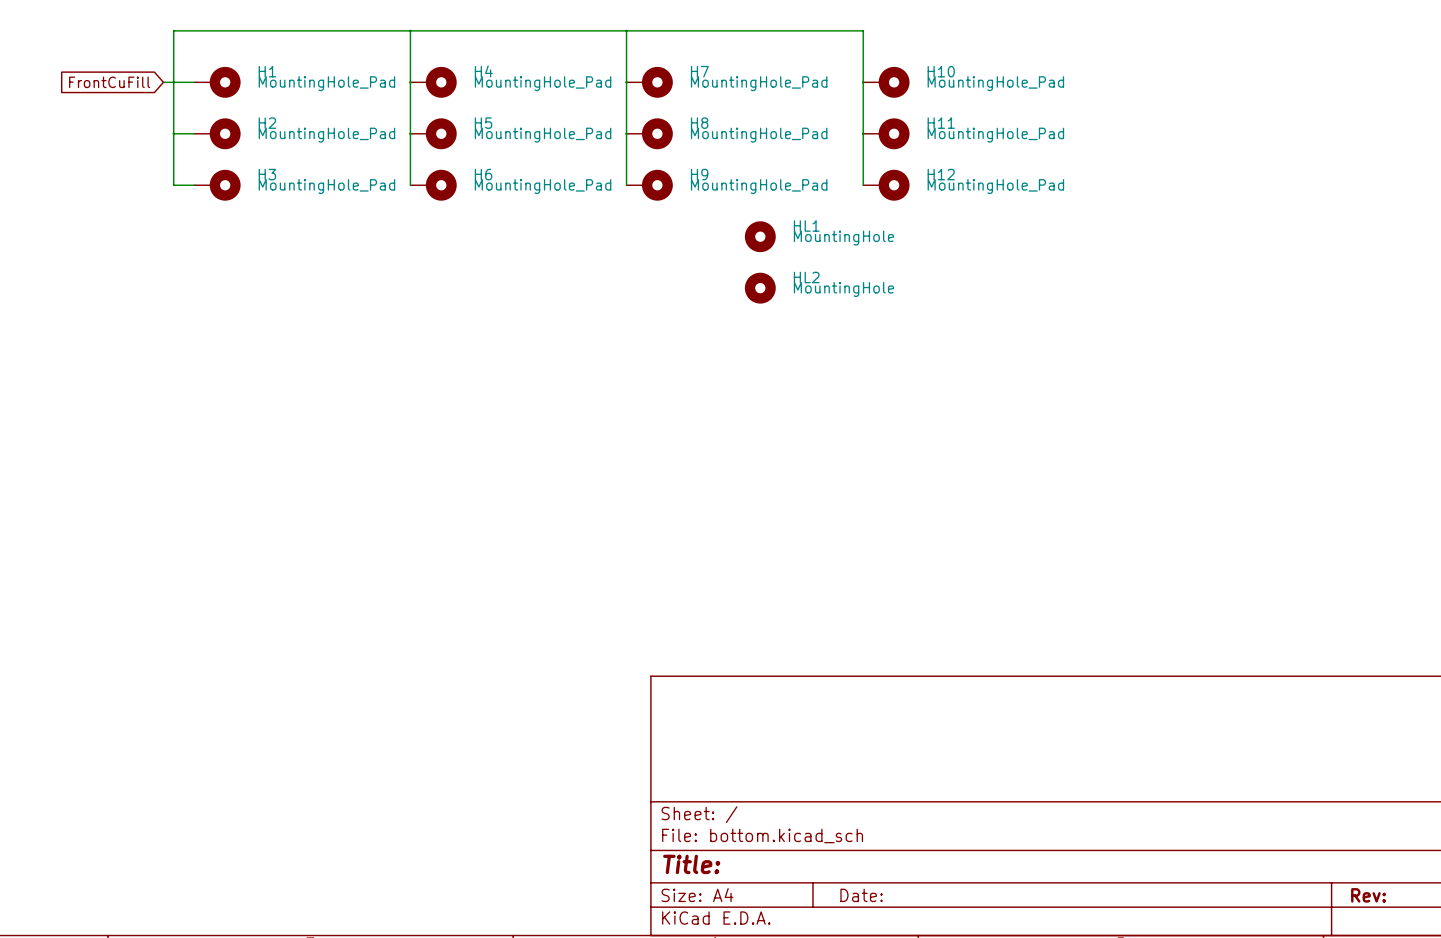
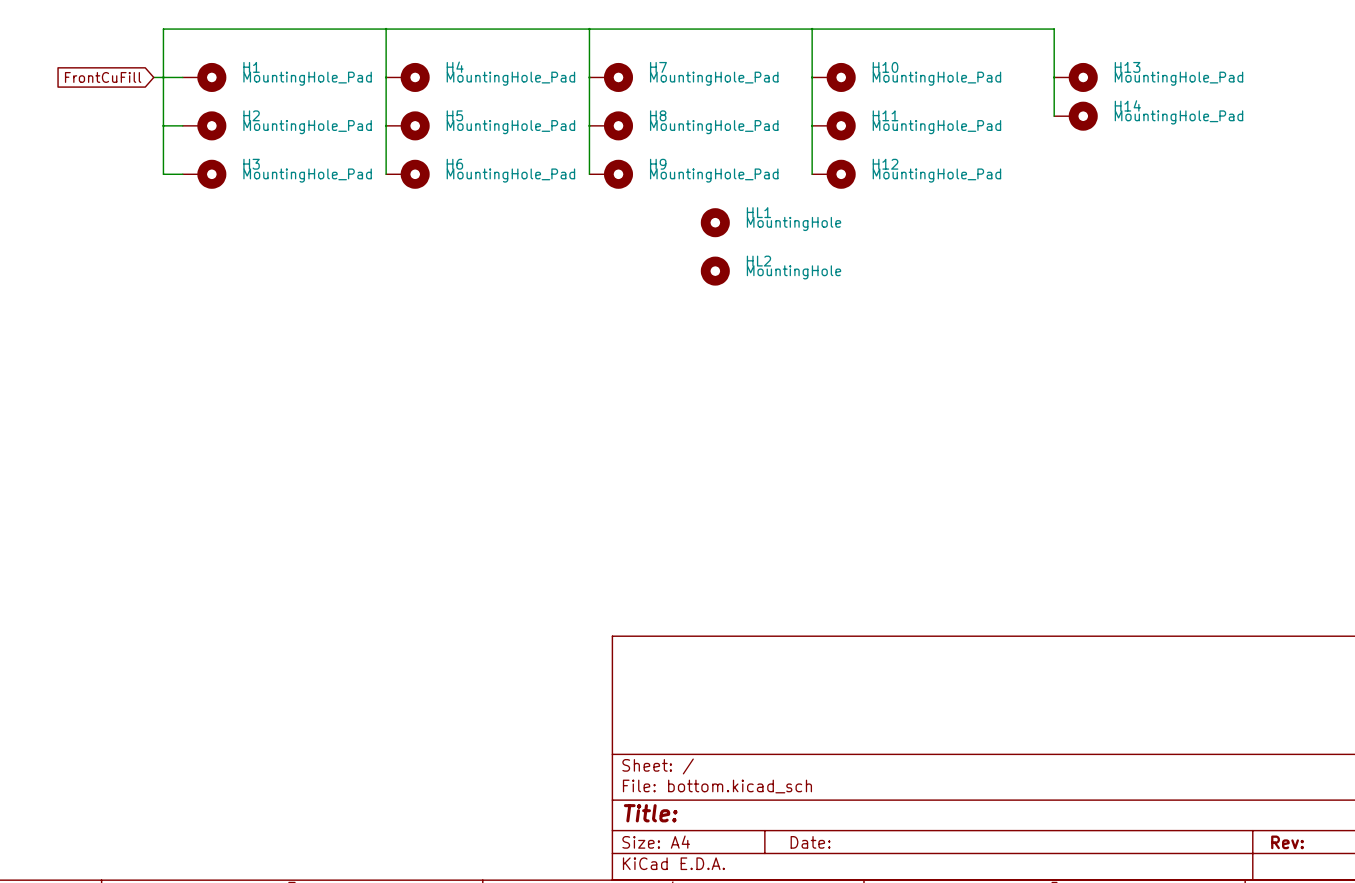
wire: none -> (812, 29) (1054, 29) (1054, 116)
H13: none -> MountingHole_Pad (1075, 77)
H14: none -> MountingHole_Pad (1075, 116)

